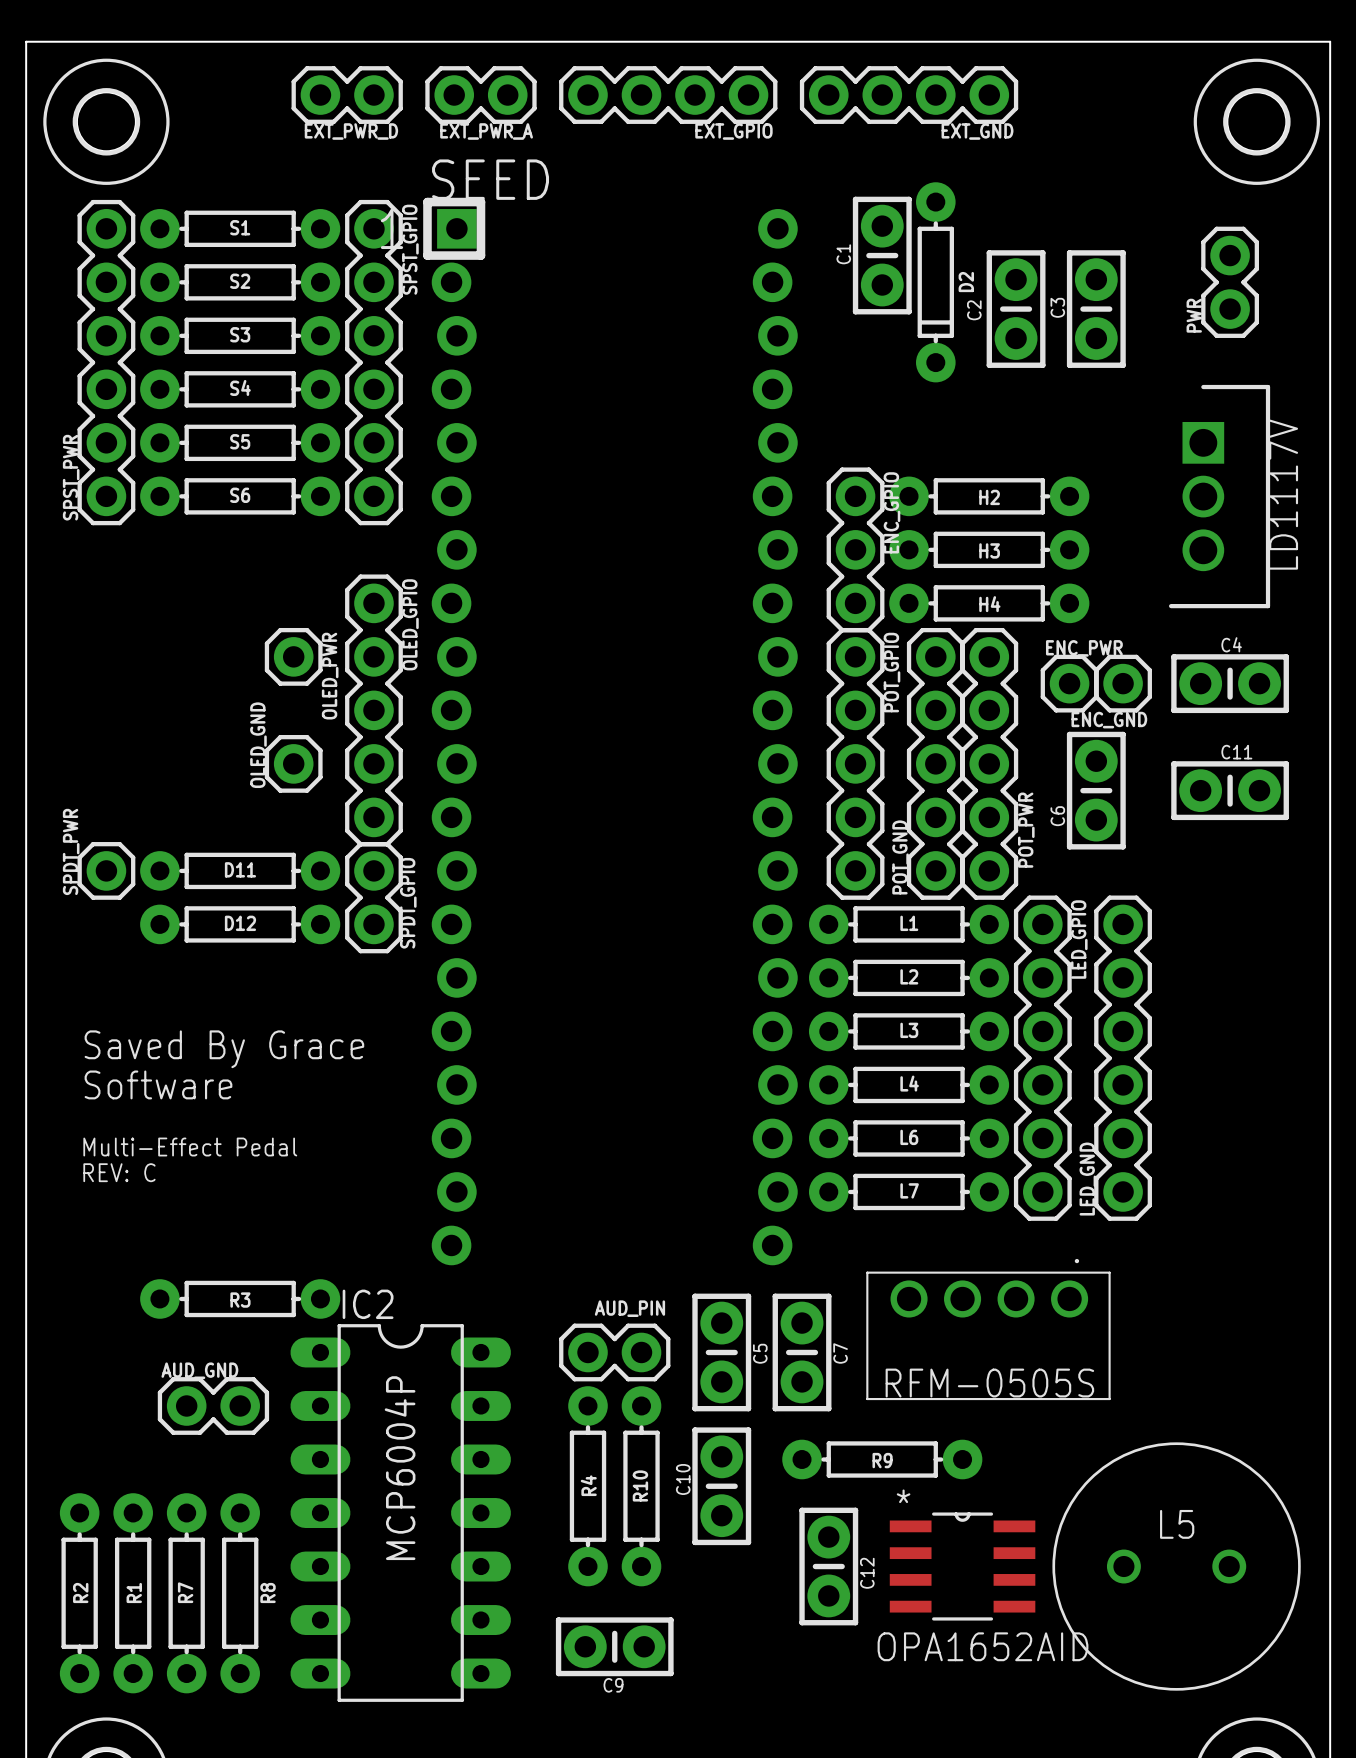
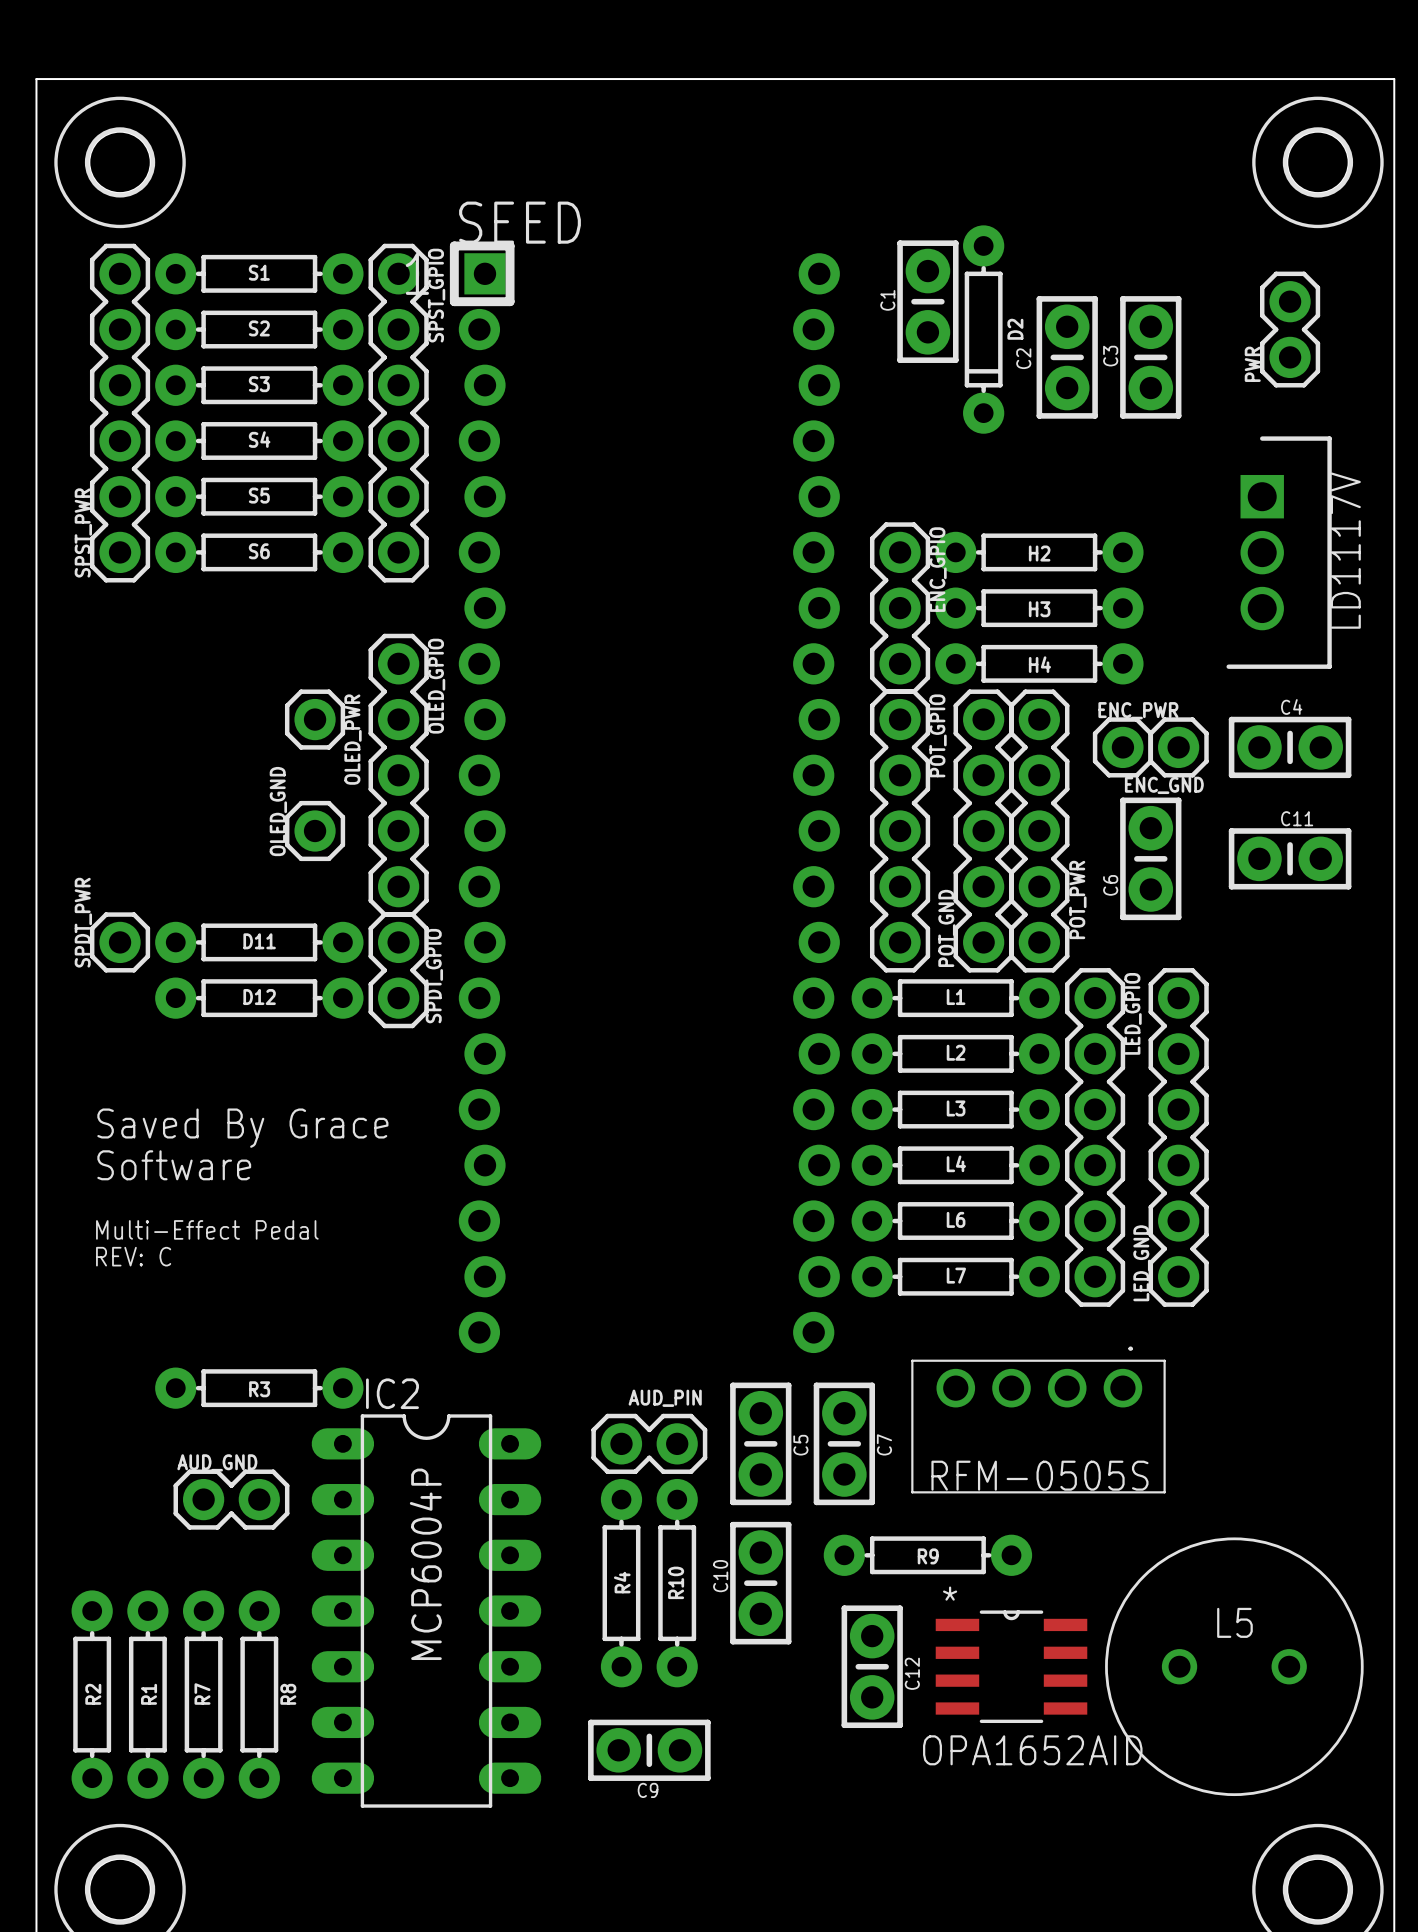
EXT_PWR_D: (347, 95) -> none
EXT_PWR_A: (480, 95) -> none
EXT_GPIO: (668, 95) -> none
EXT_GND: (909, 95) -> none

